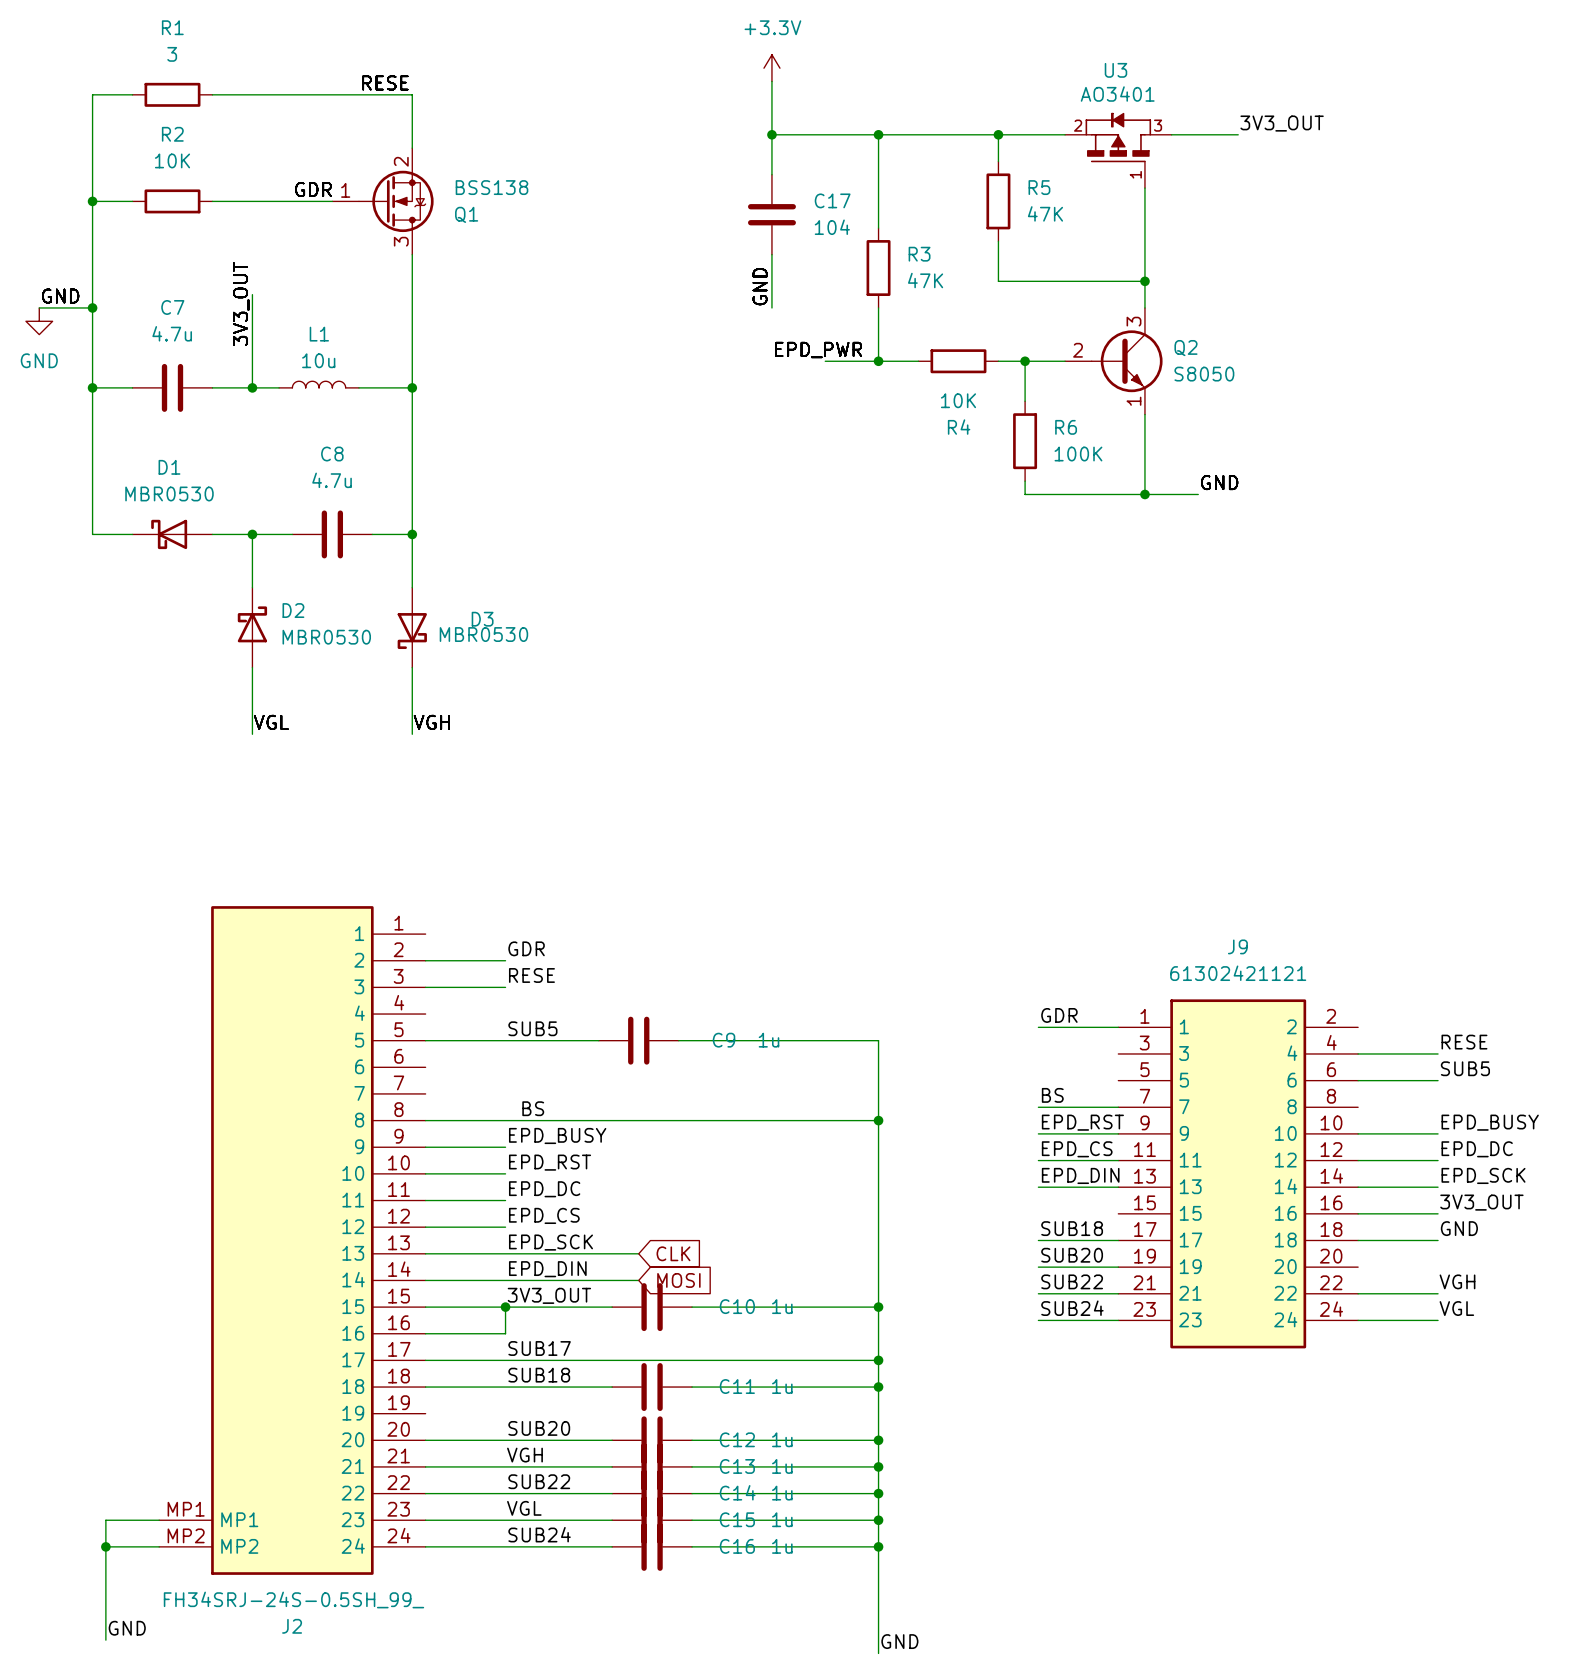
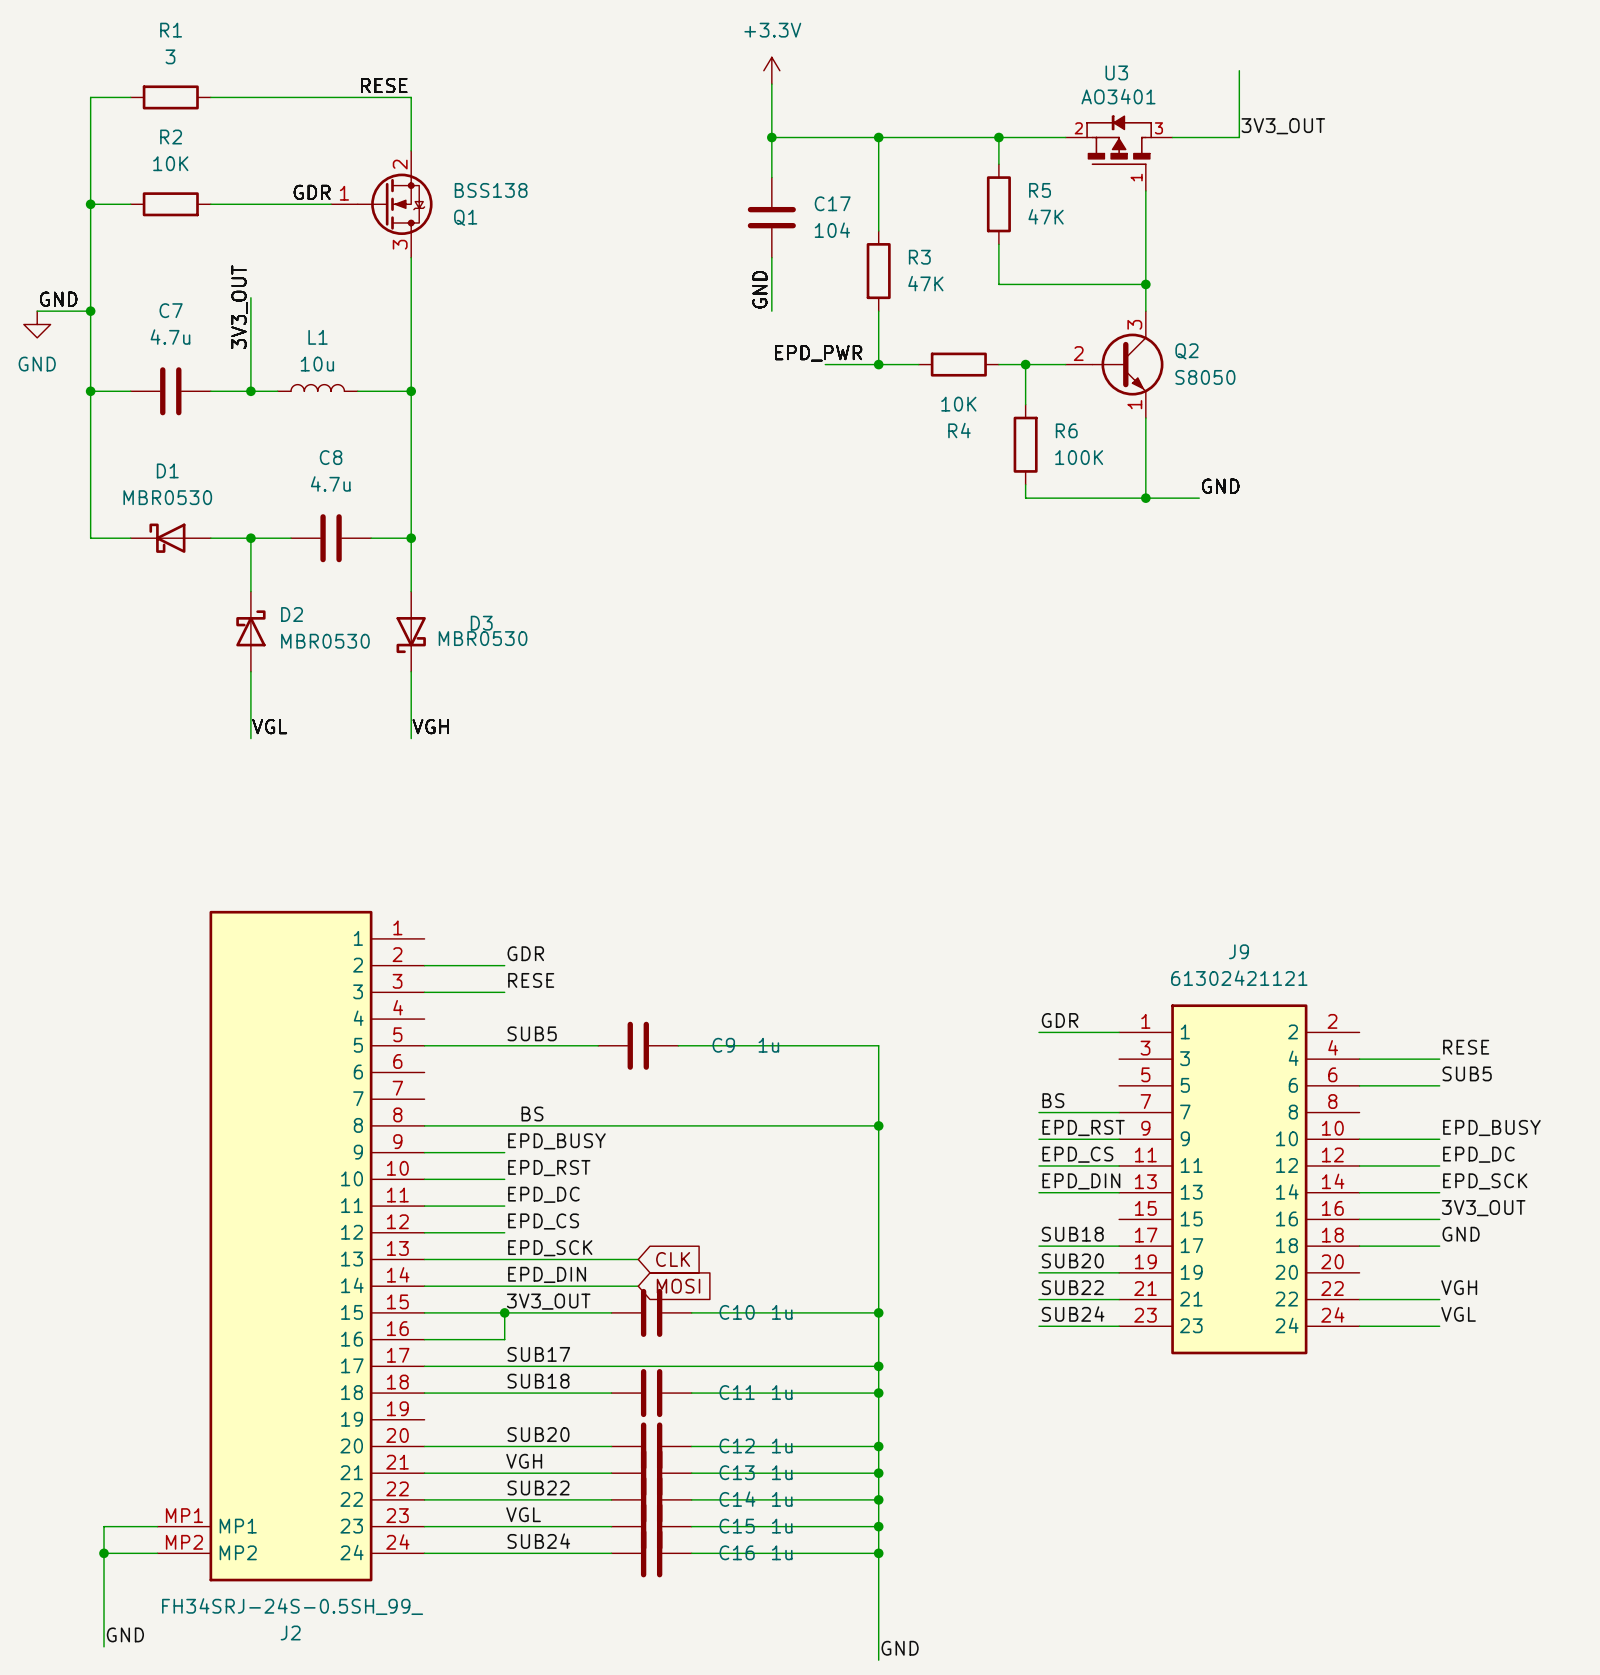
wire: none -> (1239, 70) (1239, 137)

